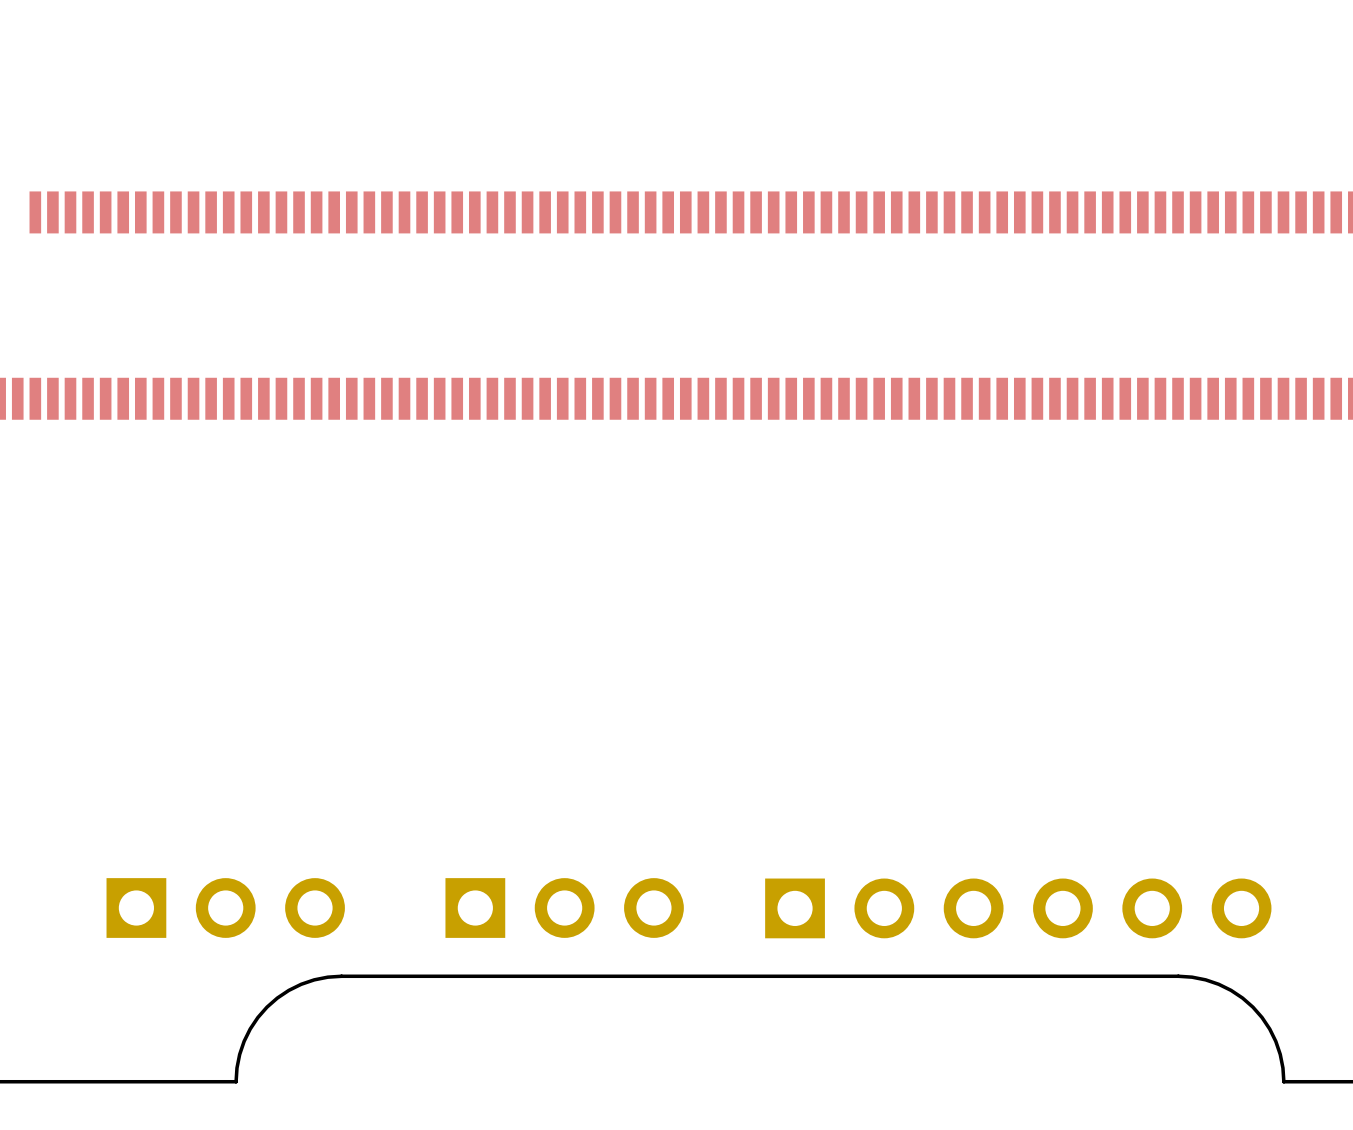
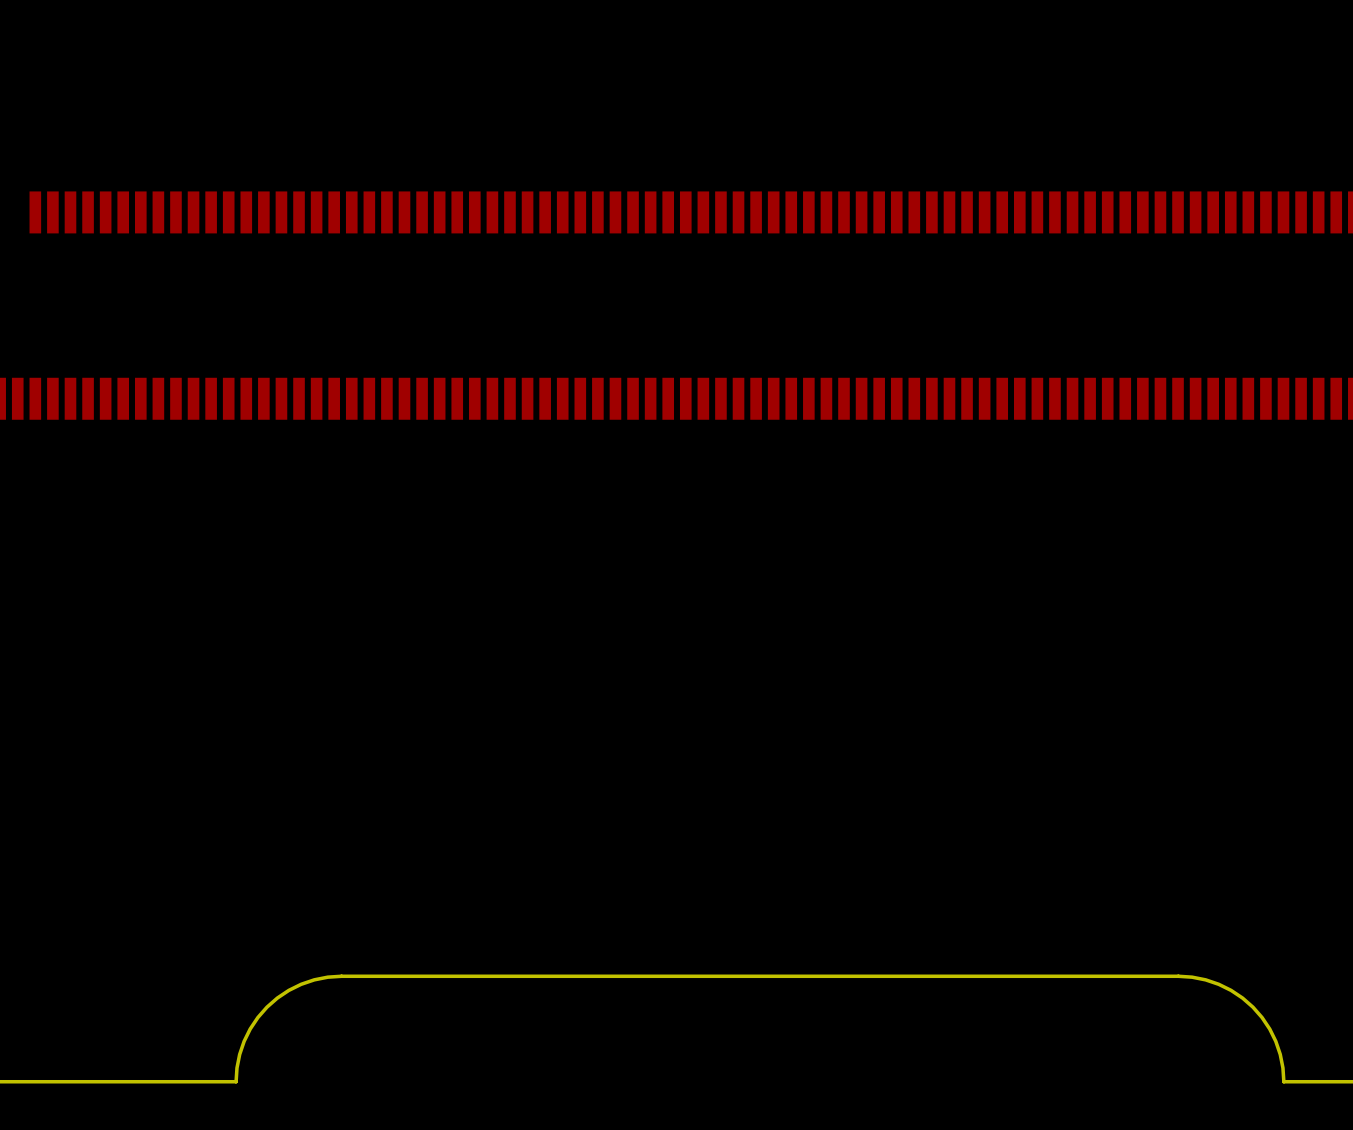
part: (225, 908) -> none
part: (564, 908) -> none
part: (1018, 908) -> none

